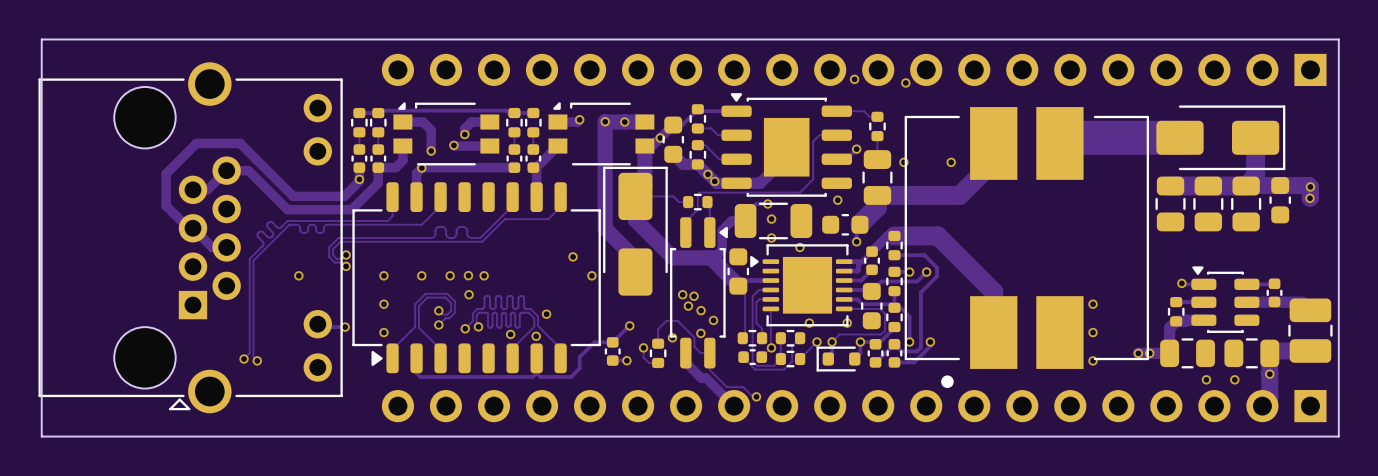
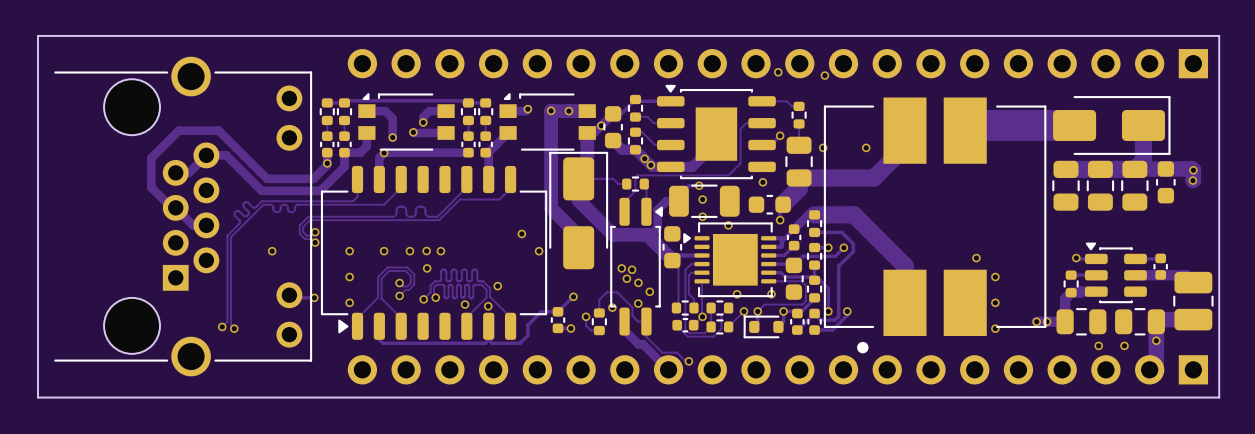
part footprint: [38, 62, 343, 414] -> [54, 56, 313, 377]
via: none -> (976, 258)

